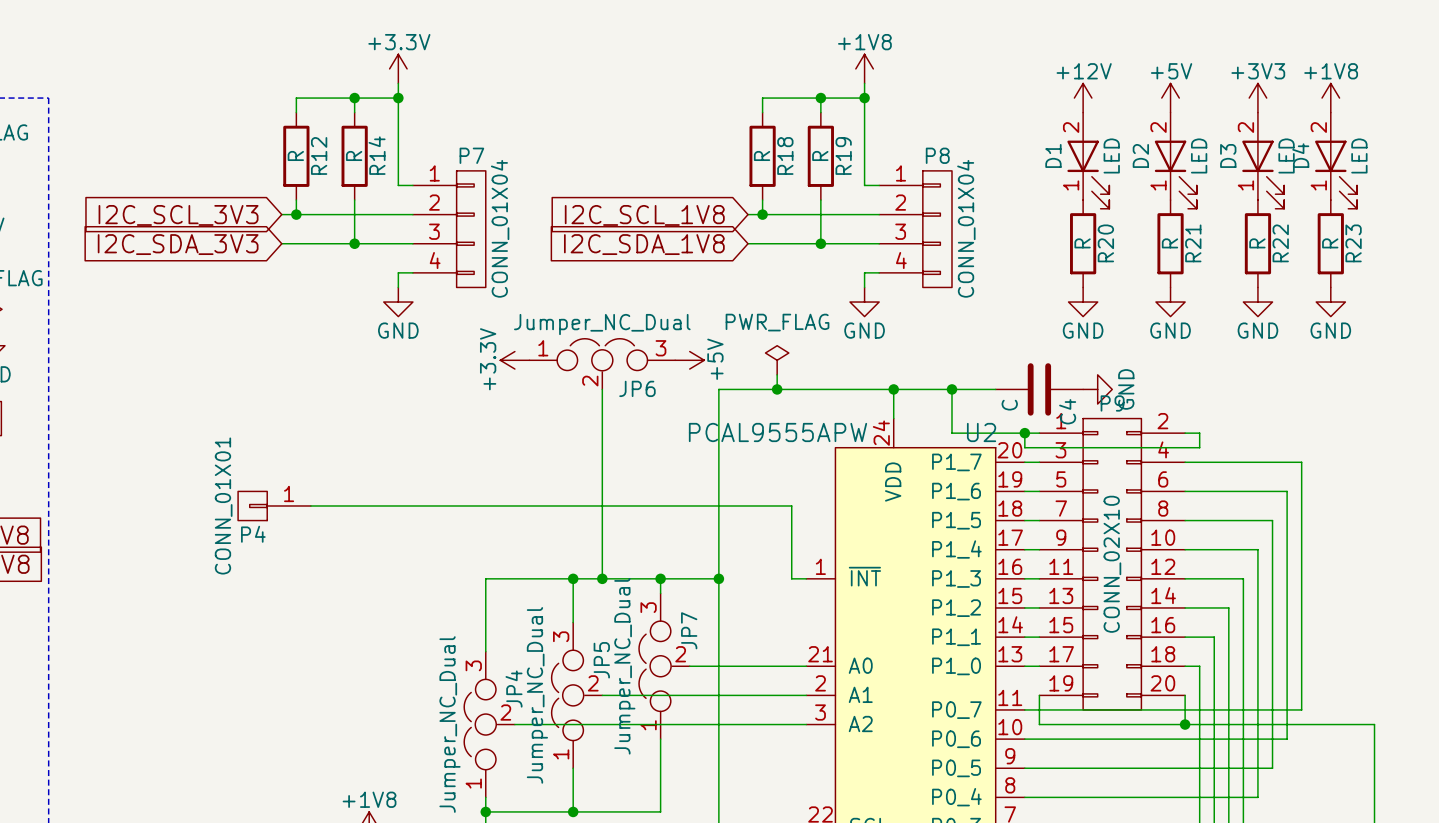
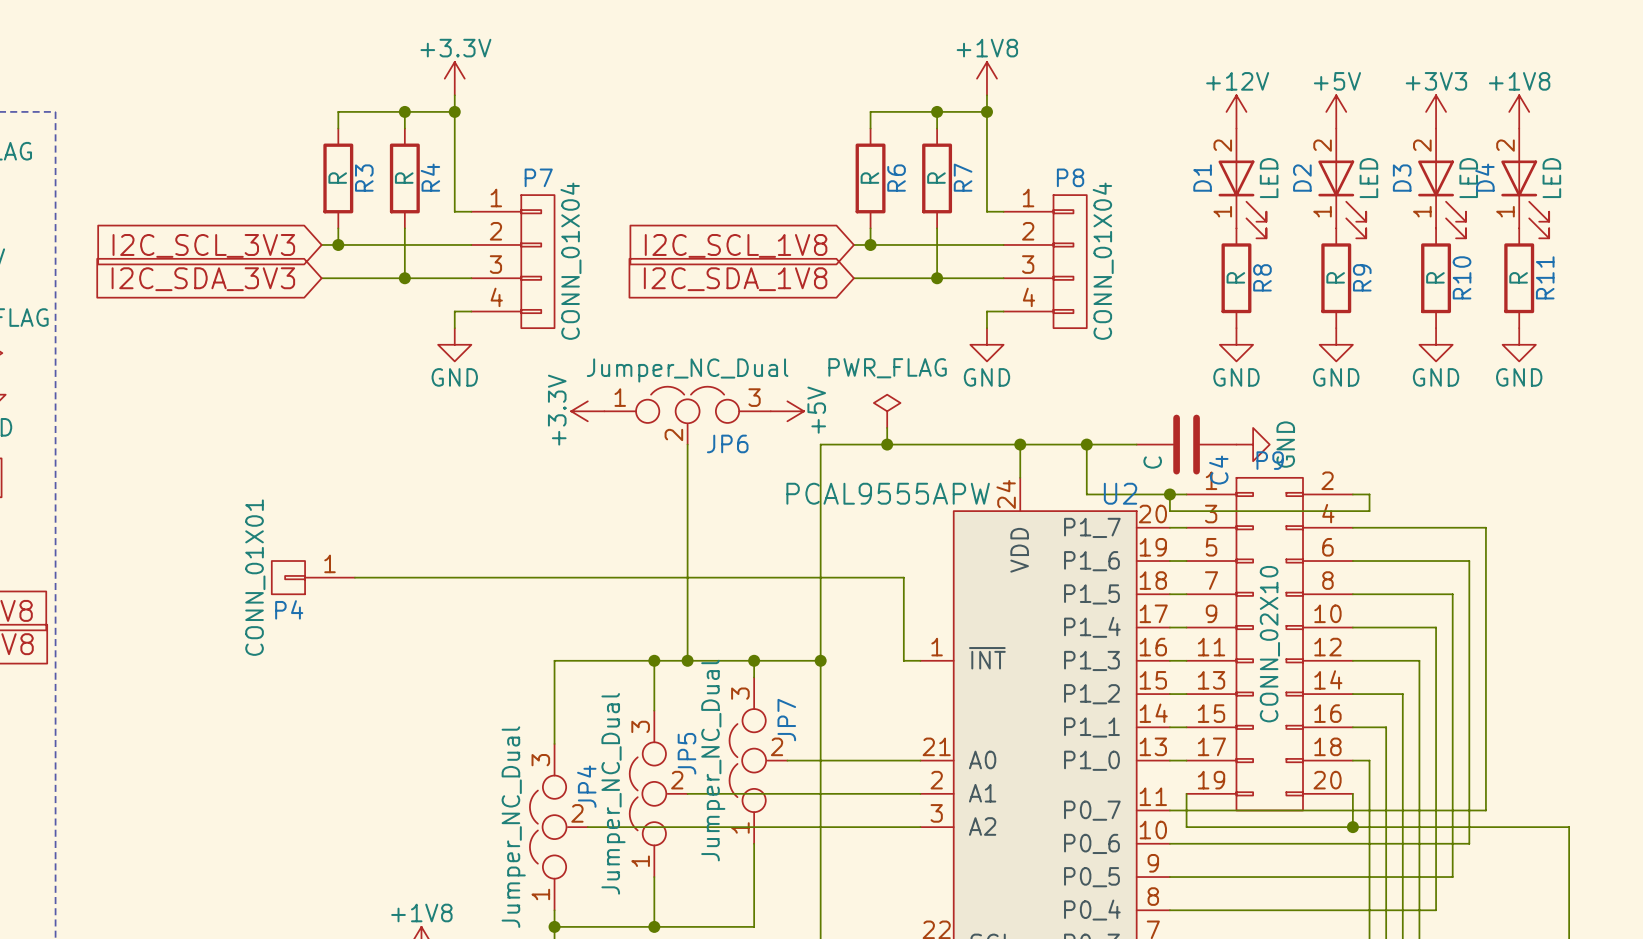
R12 name: R12 (319, 155) -> R3 (364, 178)
R14 name: R14 (377, 155) -> R4 (430, 177)
R18 name: R18 (785, 155) -> R6 (896, 178)
R19 name: R19 (843, 155) -> R7 (963, 177)
R20 name: R20 (1105, 243) -> R8 (1262, 277)
R21 name: R21 (1193, 243) -> R9 (1362, 277)
R22 name: R22 (1280, 243) -> R10 (1462, 277)
R23 name: R23 (1353, 243) -> R11 (1545, 277)

